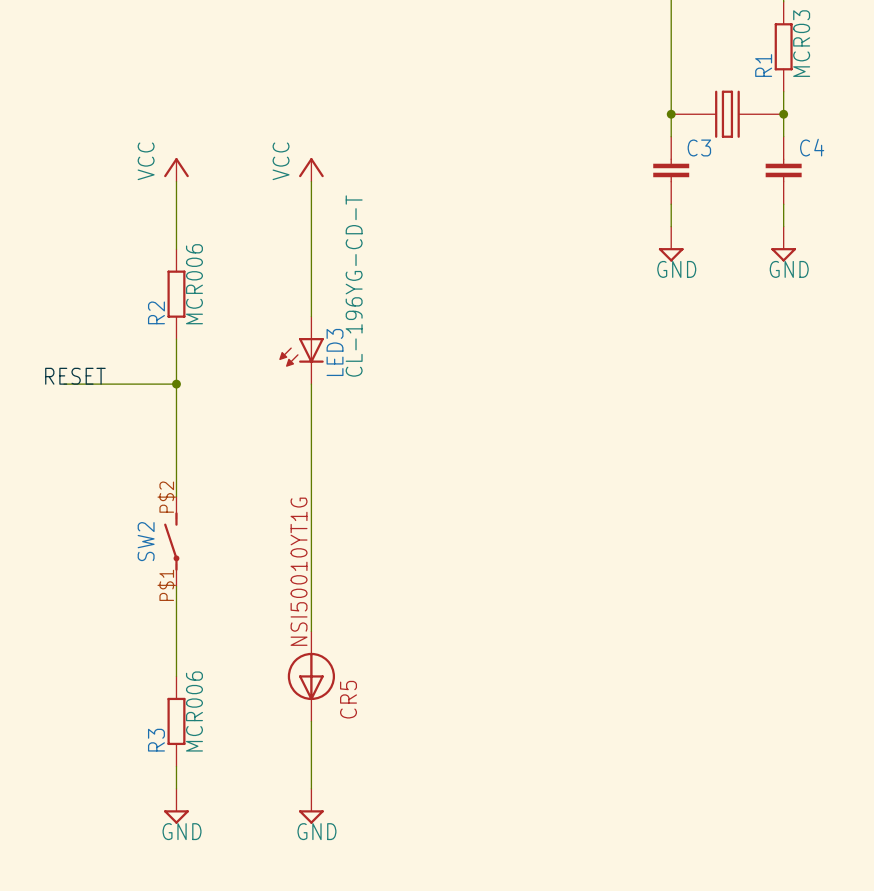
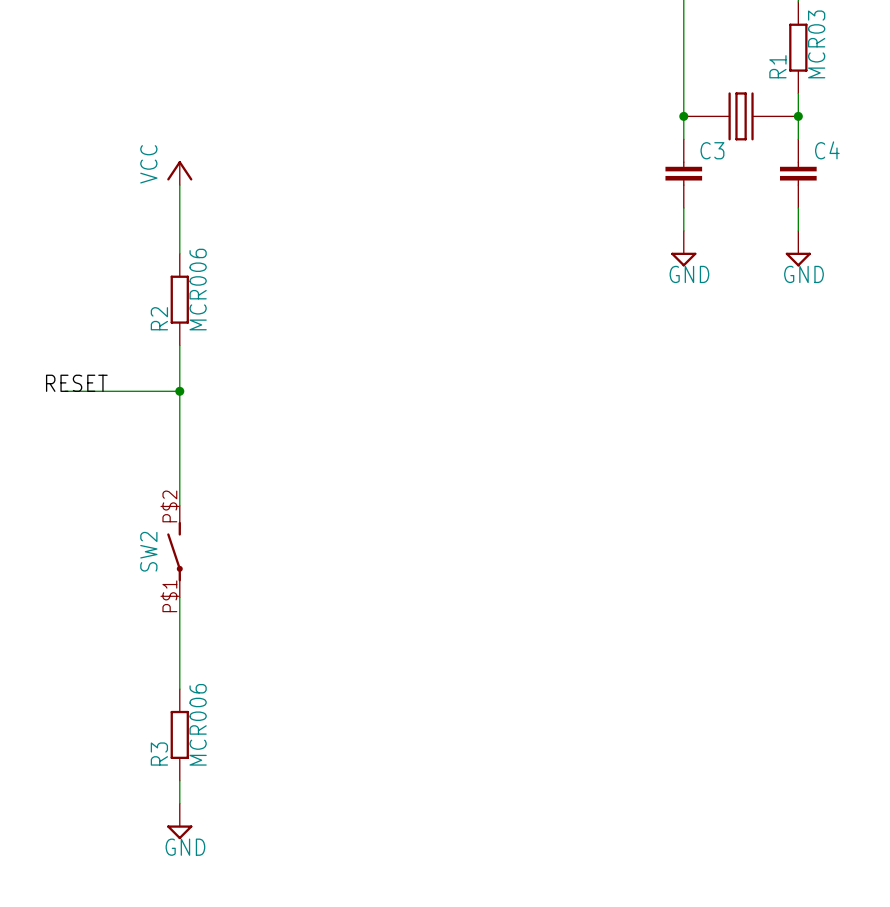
power symbol: VCC (311, 169) -> none
wire: (311, 181) (311, 316) -> none
LED3: CL-196YG-CD-T (301, 350) -> none
wire: (311, 384) (311, 631) -> none
CR5: NSI50010YT1G (311, 676) -> none
wire: (311, 721) (311, 788) -> none
power symbol: GND (311, 806) -> none

